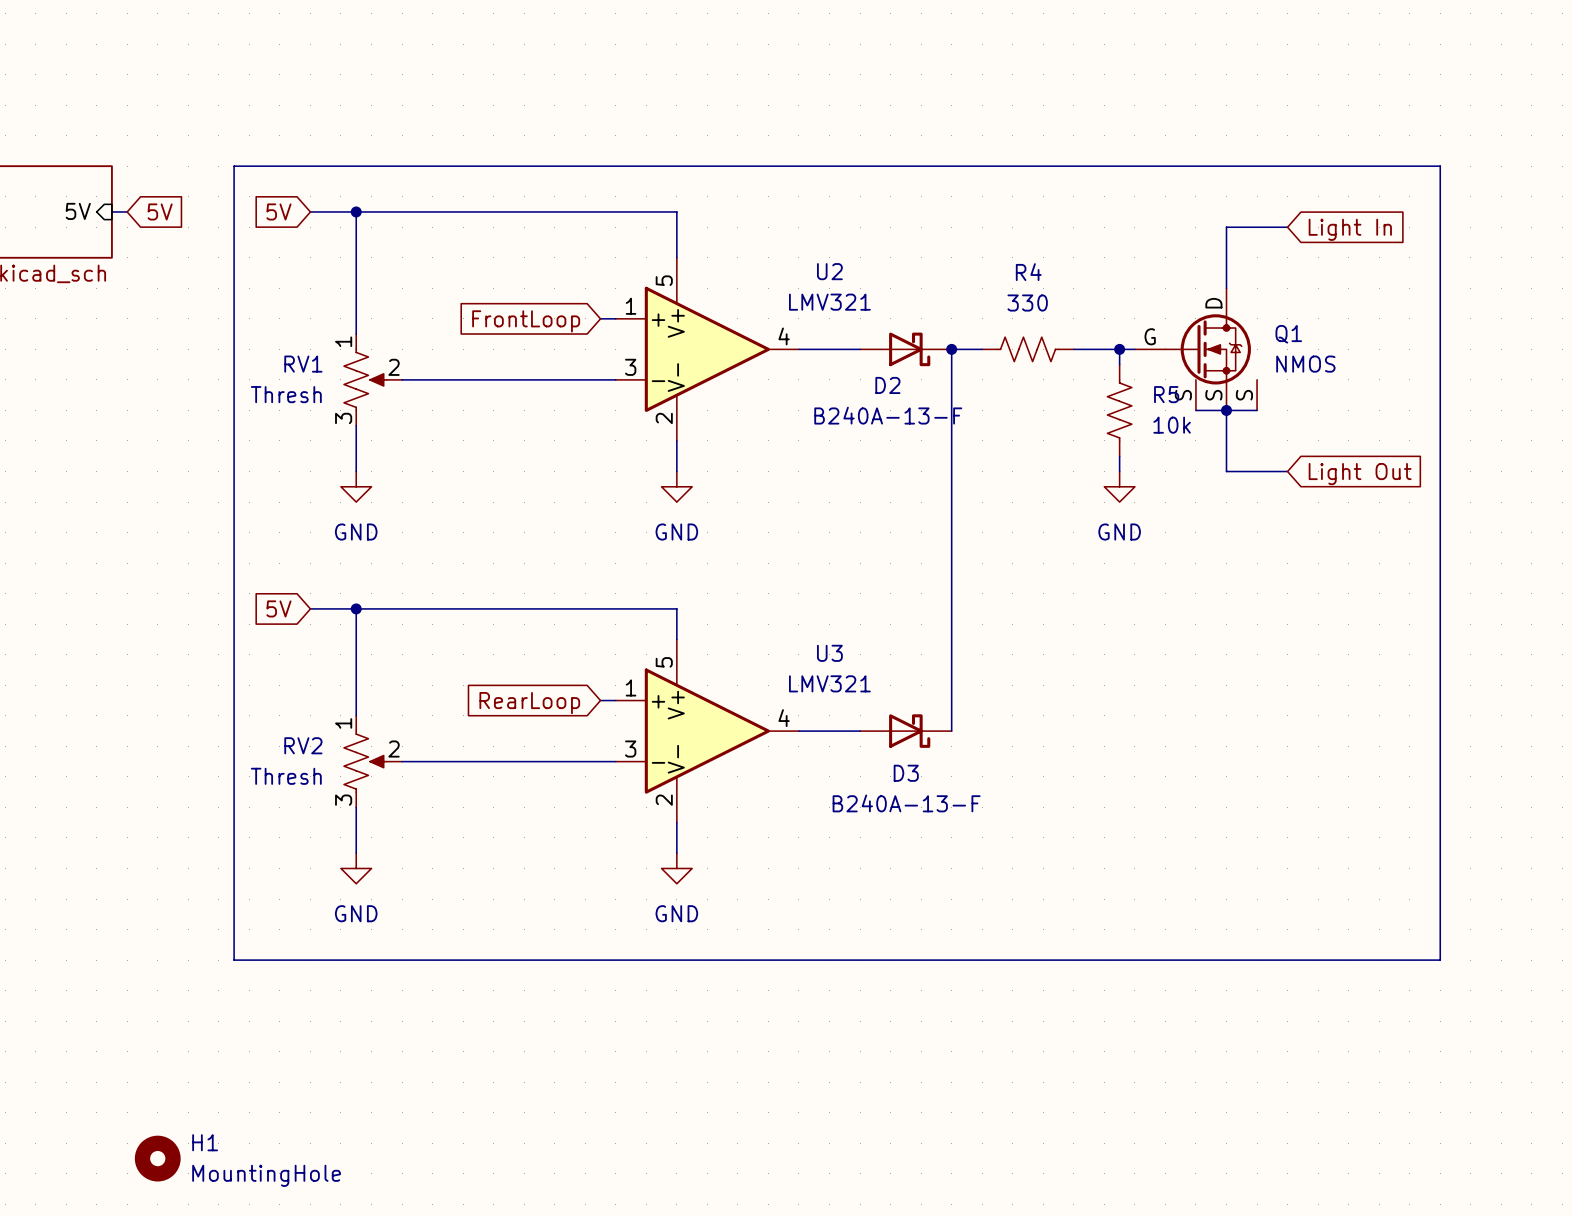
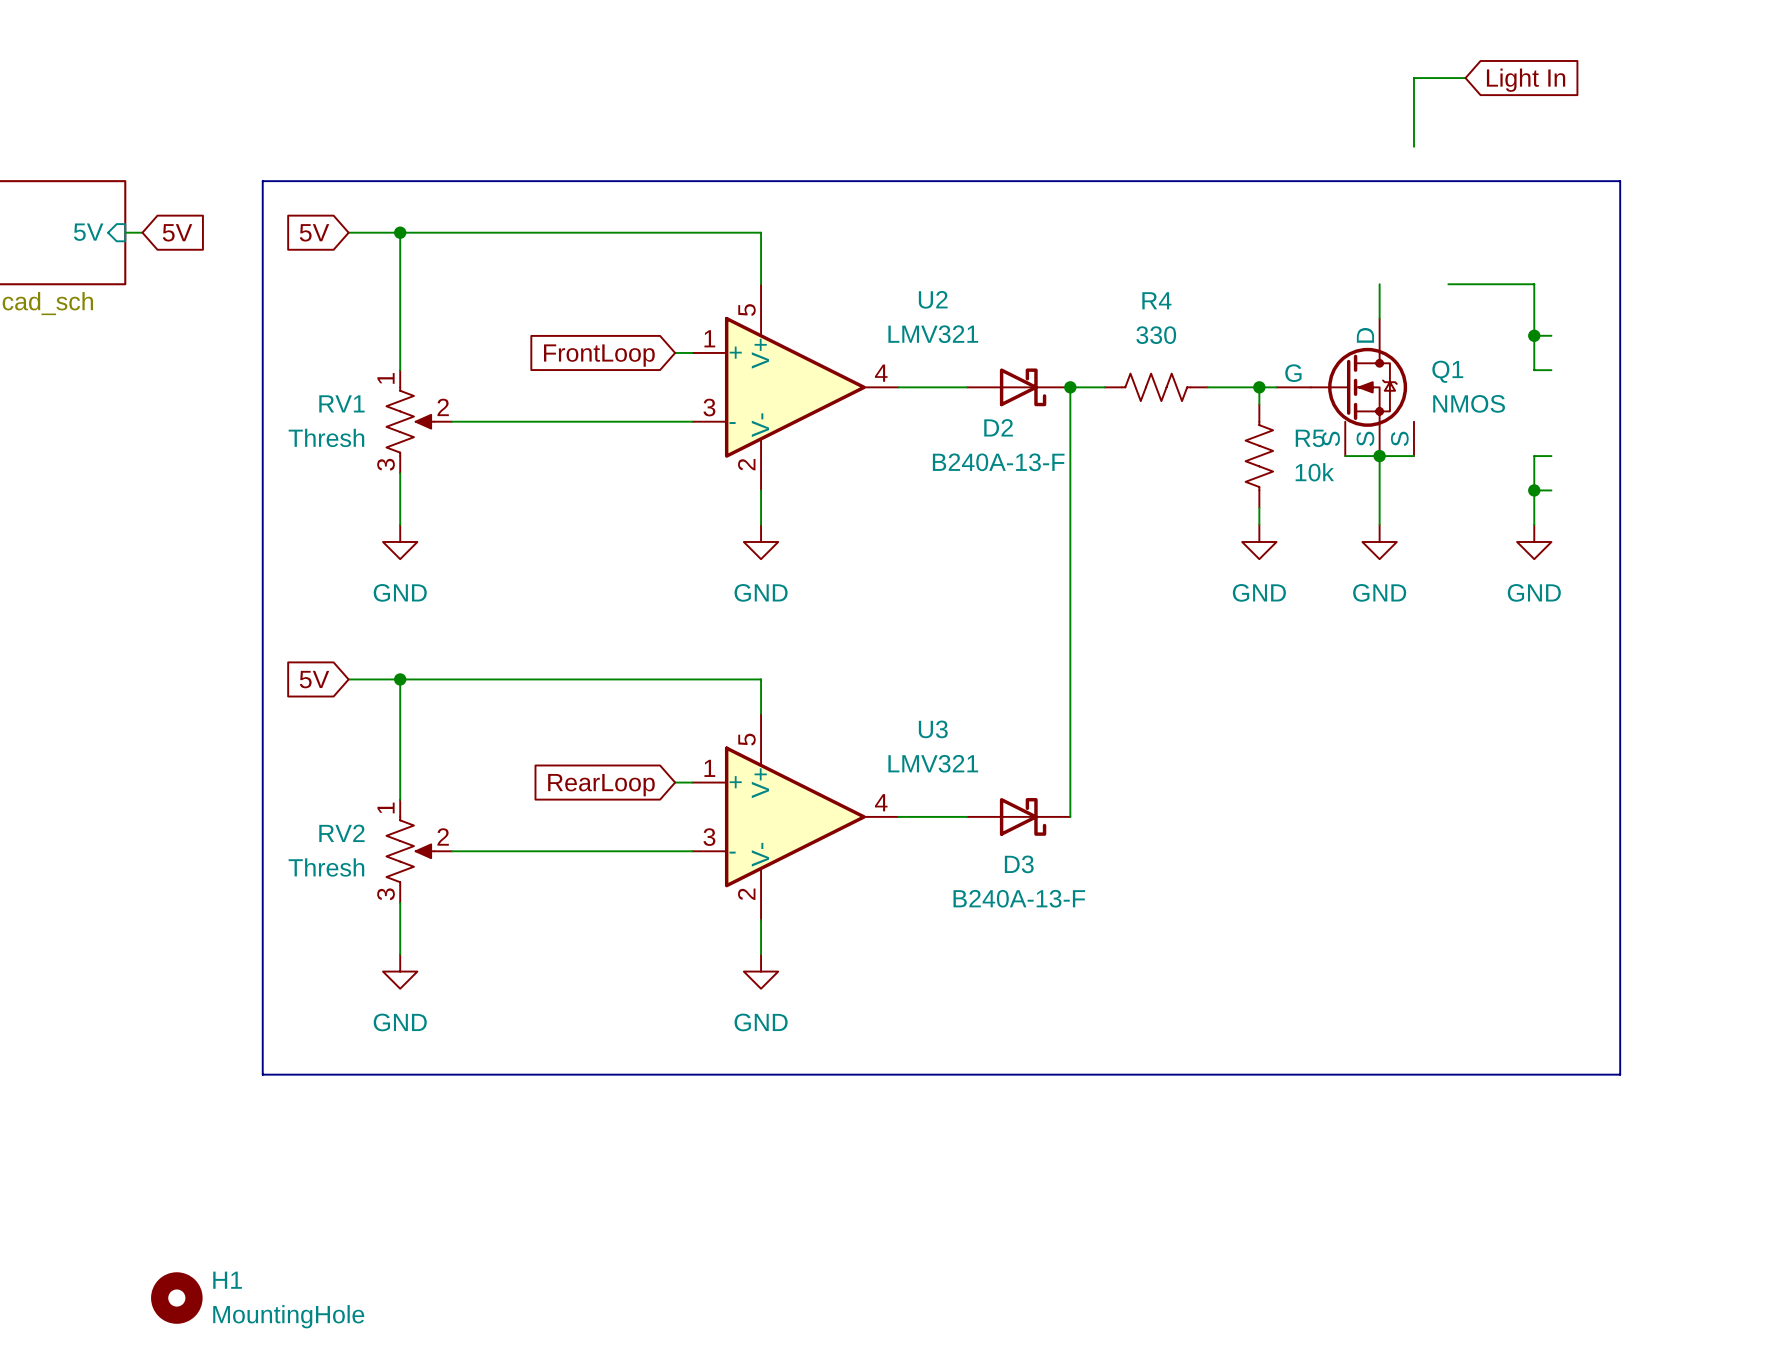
wire: none -> (1465, 78) (1413, 78) (1413, 146)
wire: (1287, 227) (1226, 227) (1226, 257) -> none
global label position: Light In (1350, 229) -> Light In (1526, 80)
wire: none -> (1448, 284) (1534, 284) (1534, 370) (1551, 370)
wire: none -> (1534, 335) (1551, 335)
junction: none -> (1534, 335)
wire: none -> (1551, 456) (1534, 456) (1534, 524)
wire: none -> (1534, 490) (1551, 490)
junction: none -> (1534, 490)
wire: (1226, 471) (1287, 471) -> none
global label: Light Out (1360, 474) -> none
power symbol: none -> GND (1379, 541)
power symbol: none -> GND (1534, 541)

